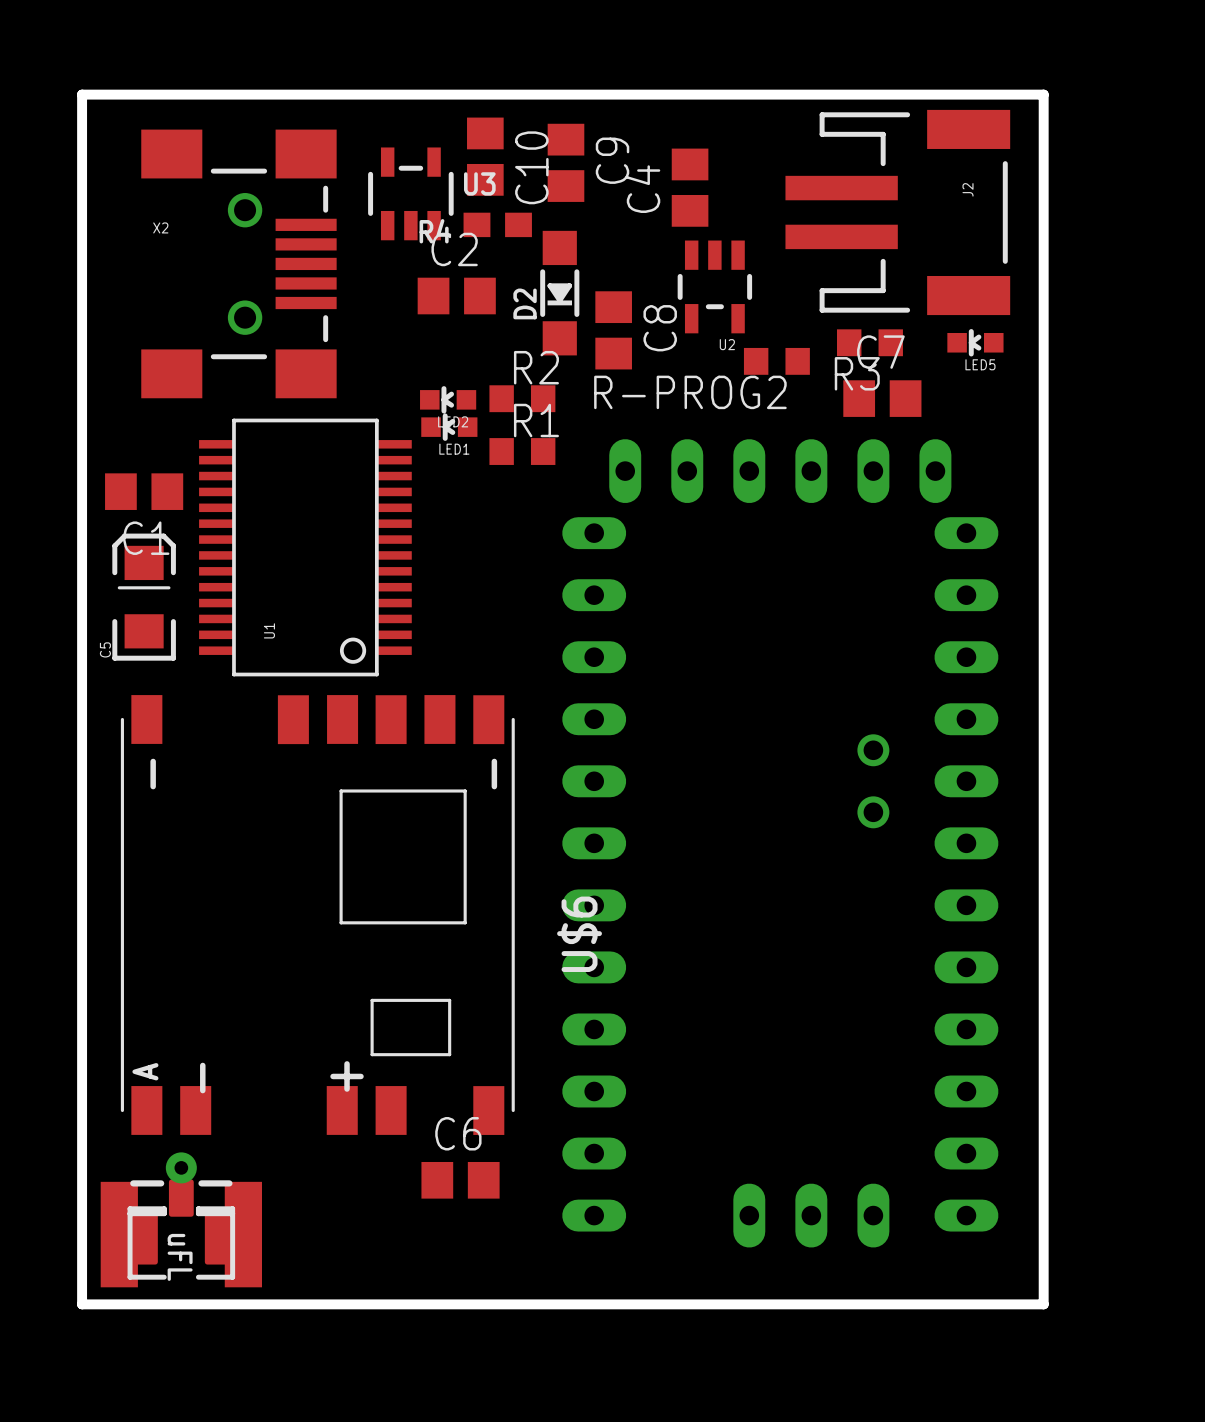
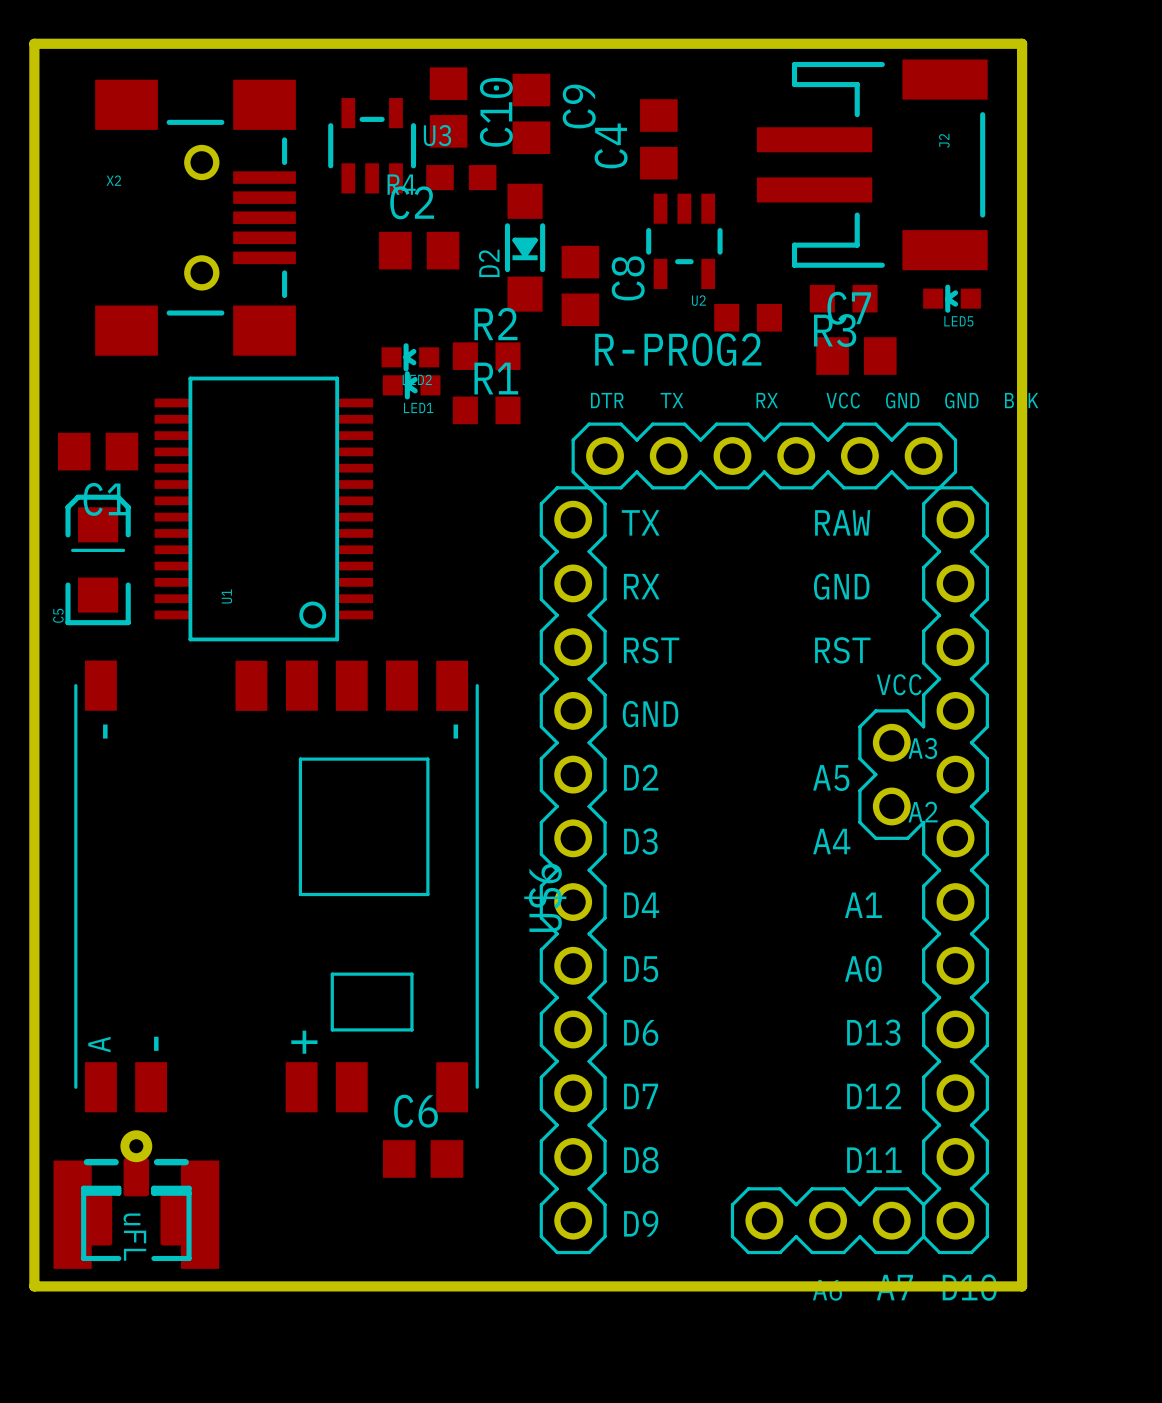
part: (780, 843) -> none
part: none -> (764, 838)

